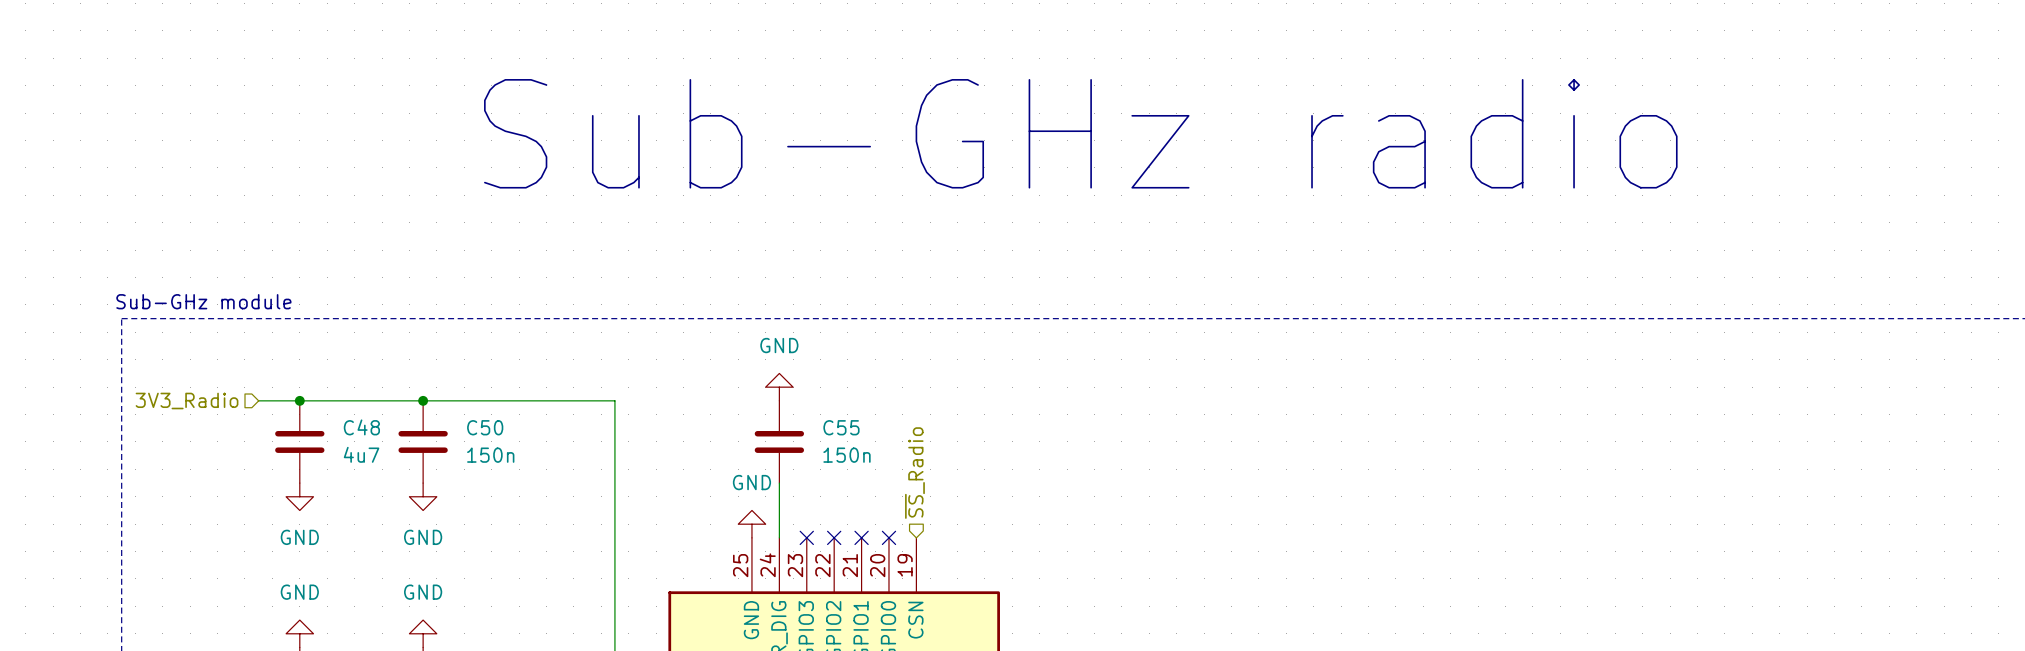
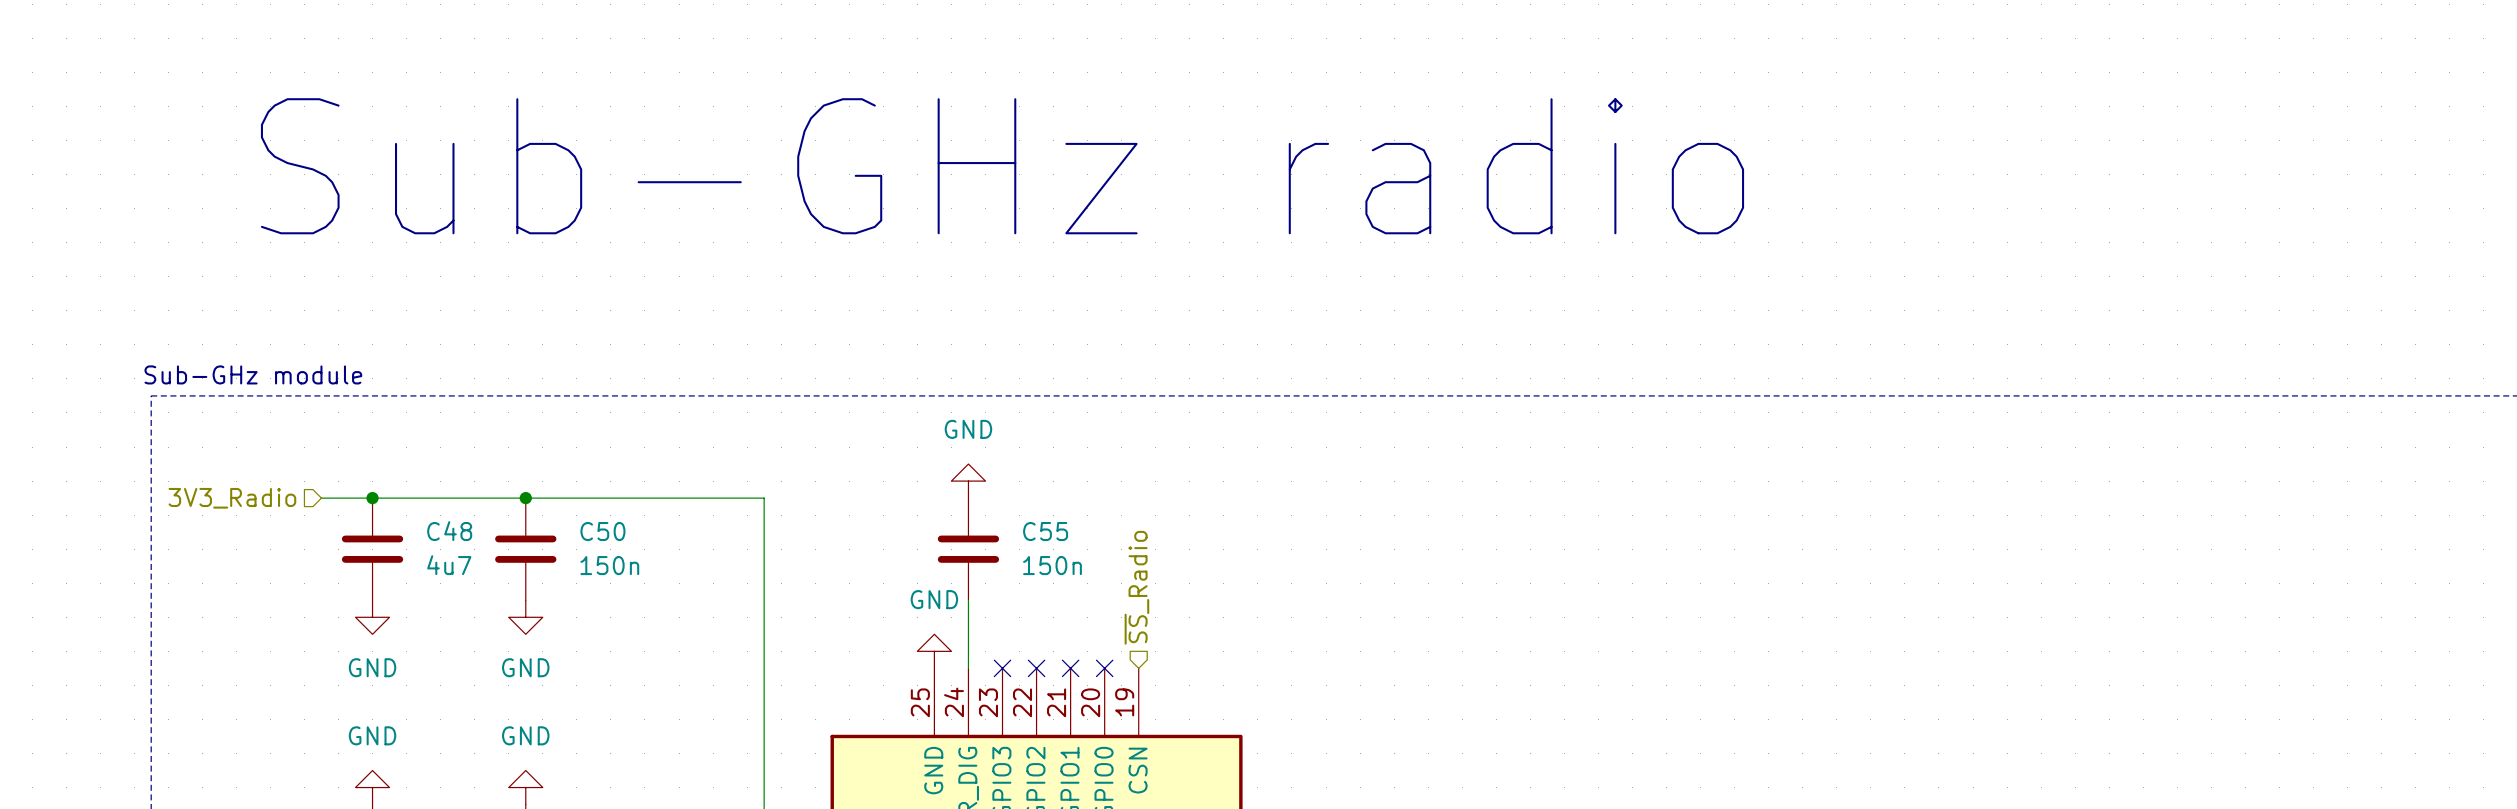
text: none -> Sub-GHz radio (1002, 166)
text: Sub-GHz radio (1080, 133) -> none

